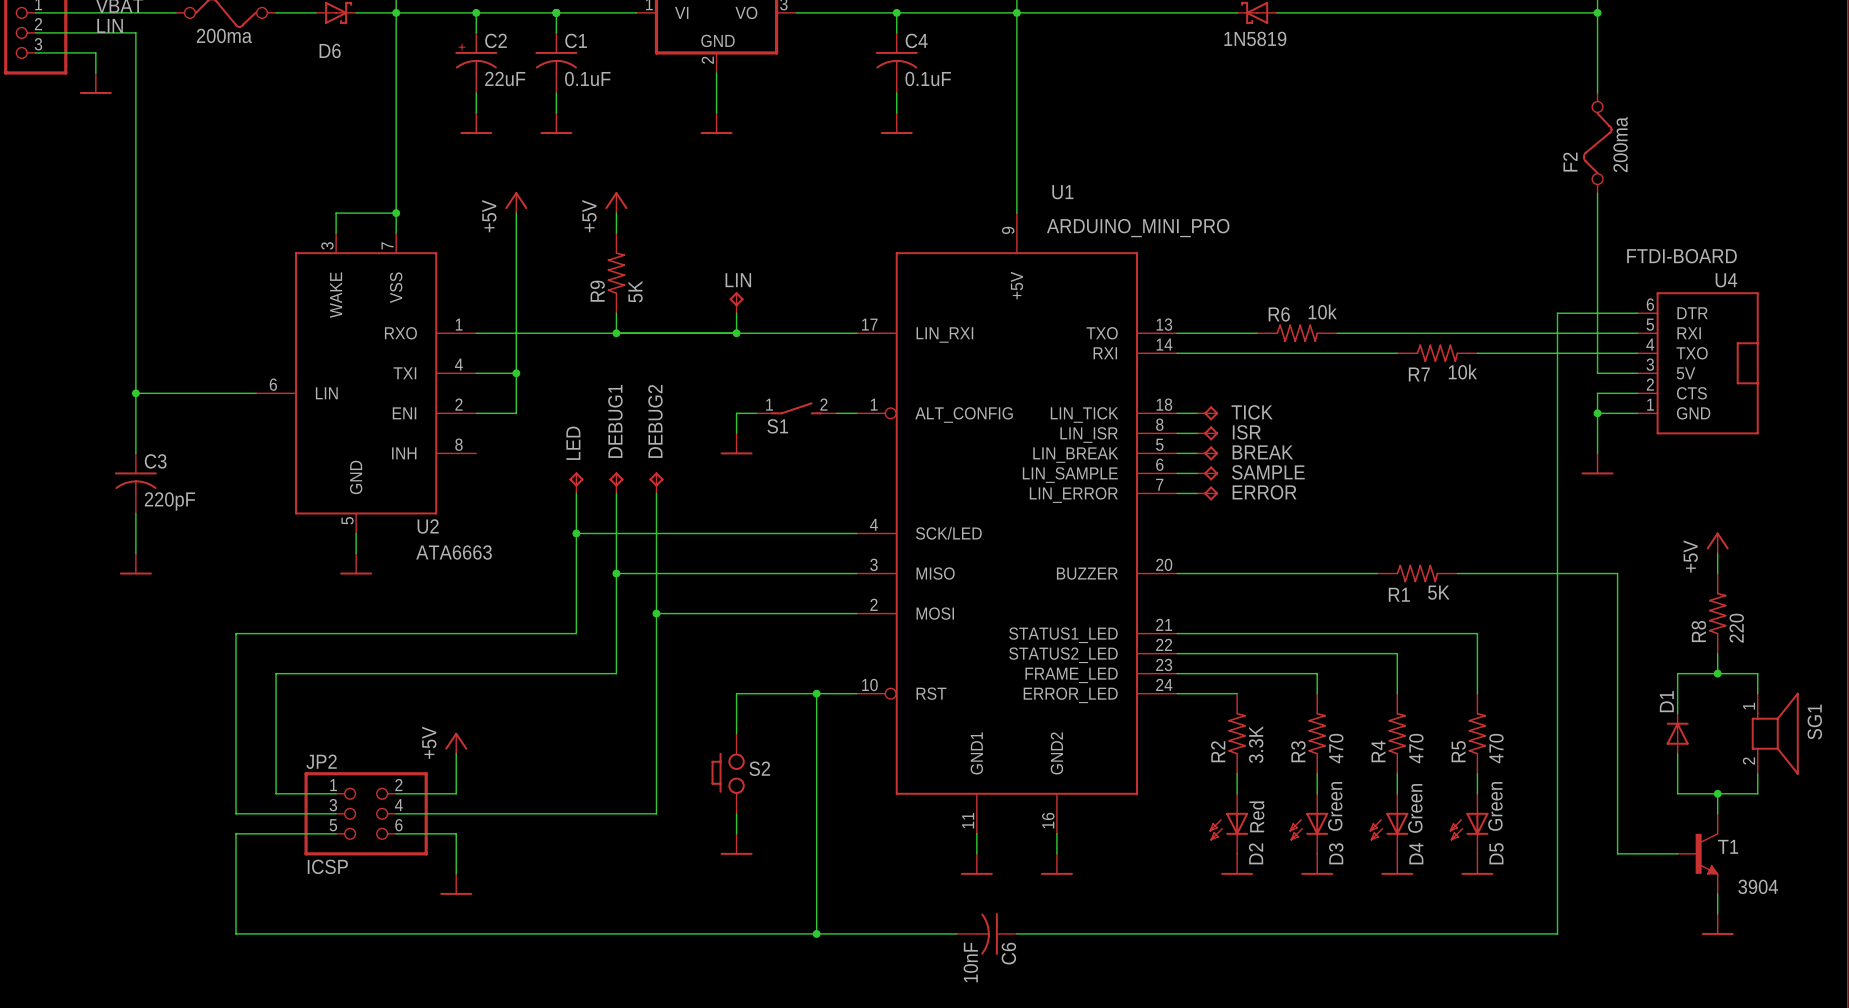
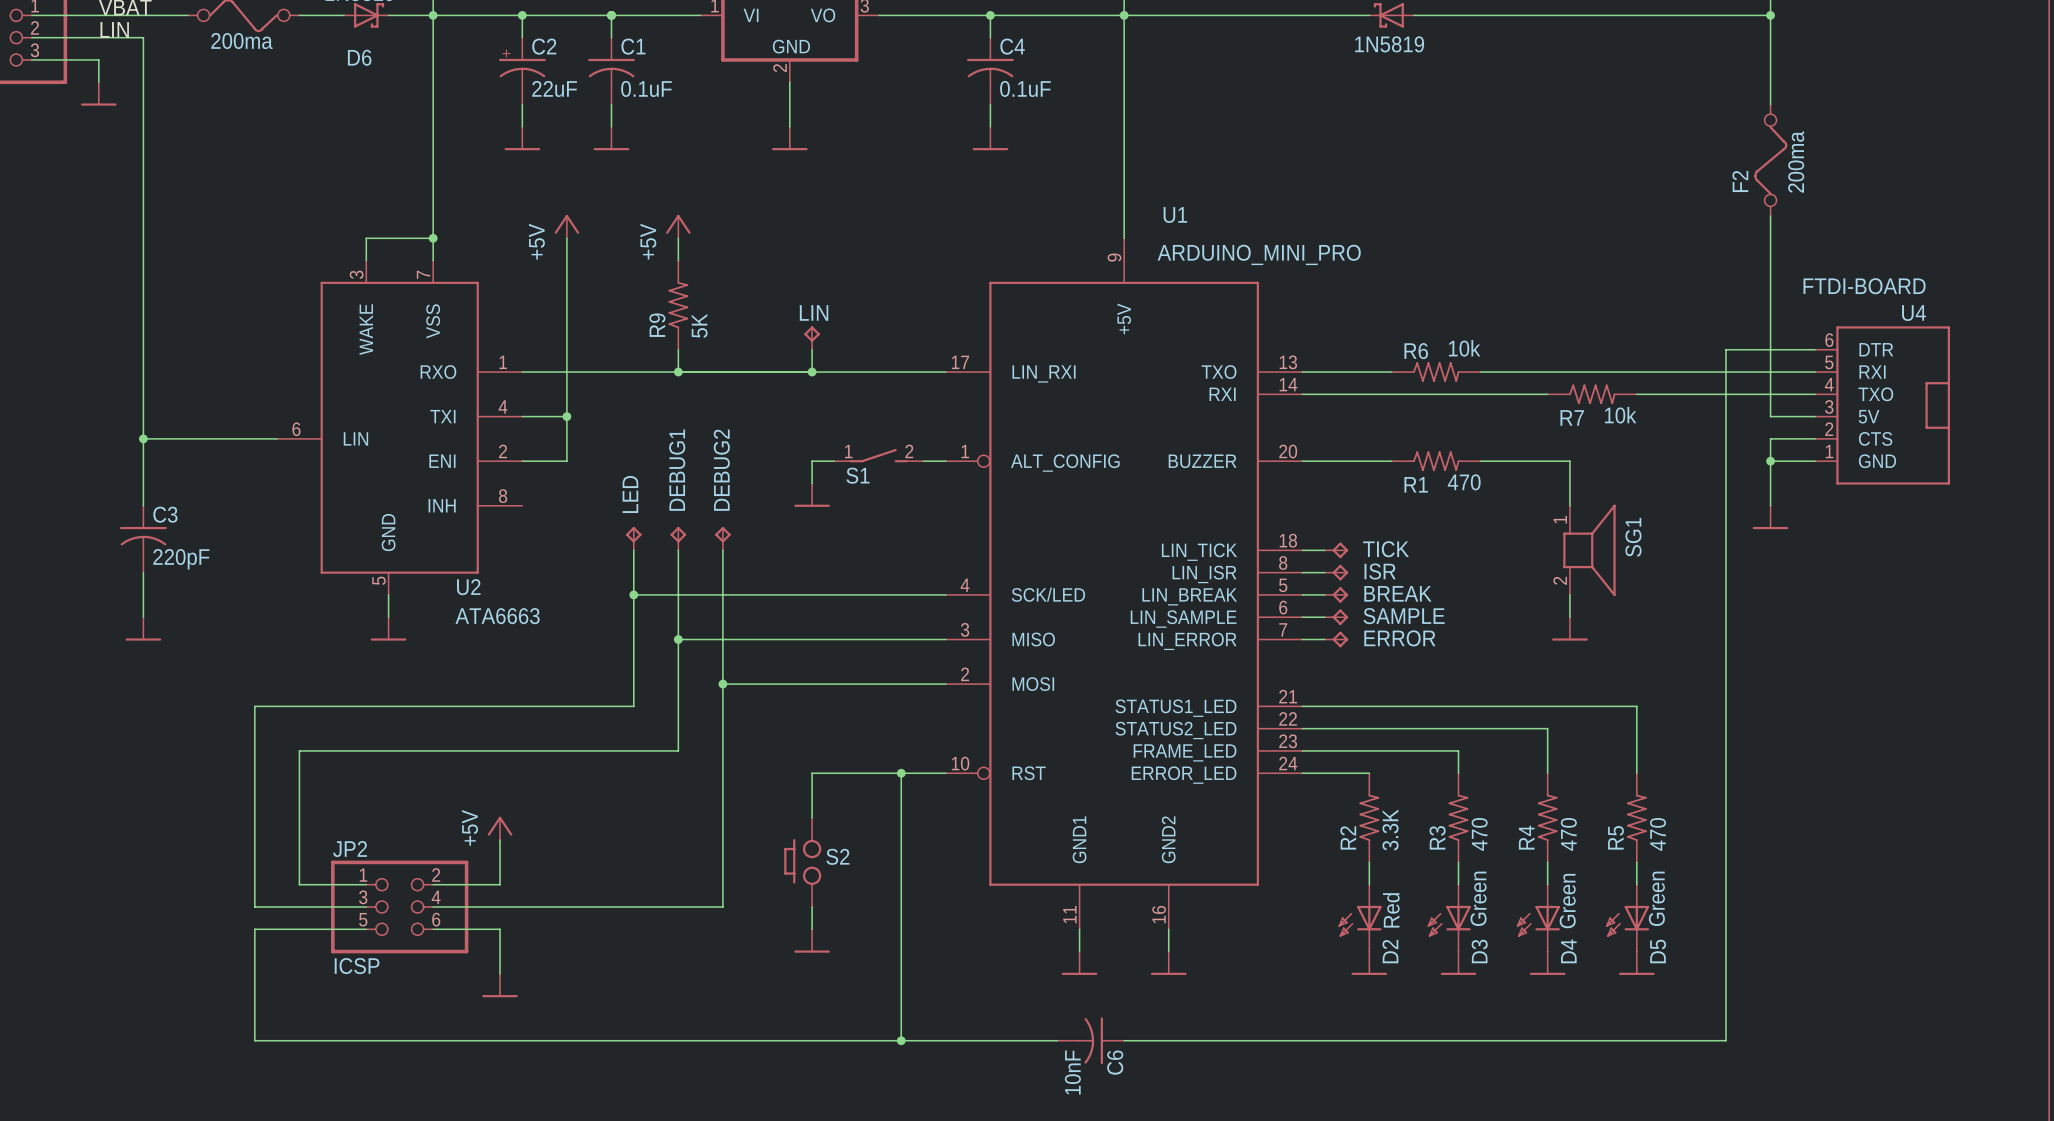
U1 symbol: [856, 213, 1178, 834] -> [945, 238, 1303, 930]
wire: none -> (1324, 461) (1391, 461)
TICK: (1207, 413) -> none
wire: none -> (1480, 461) (1569, 461) (1569, 505)
wire: (1177, 433) (1197, 433) -> (1302, 572) (1324, 572)
ISR position: (1207, 433) -> (1336, 572)
wire: (1177, 453) (1197, 453) -> (1302, 594) (1324, 594)
BREAK position: (1207, 453) -> (1336, 594)
wire: (1177, 473) (1197, 473) -> (1302, 617) (1324, 617)
SAMPLE position: (1207, 473) -> (1336, 617)
ERROR name: ERROR (1264, 492) -> TICK (1386, 549)
wire: none -> (1569, 594) (1569, 617)
power symbol: +5V (1717, 542) -> none
wire: (1717, 553) (1717, 573) -> none
power symbol: none -> (1569, 628)
wire: (1197, 573) (1377, 573) -> none
ERROR: none -> (1336, 639)
R1 position: (1417, 573) -> (1436, 461)
wire: (1457, 573) (1617, 573) (1617, 853) (1677, 853) -> none
R1 value: 5K (1438, 592) -> 470 (1464, 482)
R8: 220 (1717, 613) -> none
wire: (1717, 653) (1717, 673) -> none
junction: (1717, 673) -> none
wire: (1757, 693) (1757, 673) (1677, 673) (1677, 713) -> none
D1: (1677, 733) -> none
SG1 position: (1775, 733) -> (1589, 550)
wire: (1677, 753) (1677, 793) (1757, 793) (1757, 773) -> none
wire: (1717, 793) (1717, 813) -> none
junction: (1717, 793) -> none
T1: 3904 (1697, 853) -> none
wire: (1717, 893) (1717, 913) -> none
power symbol: (1717, 924) -> none

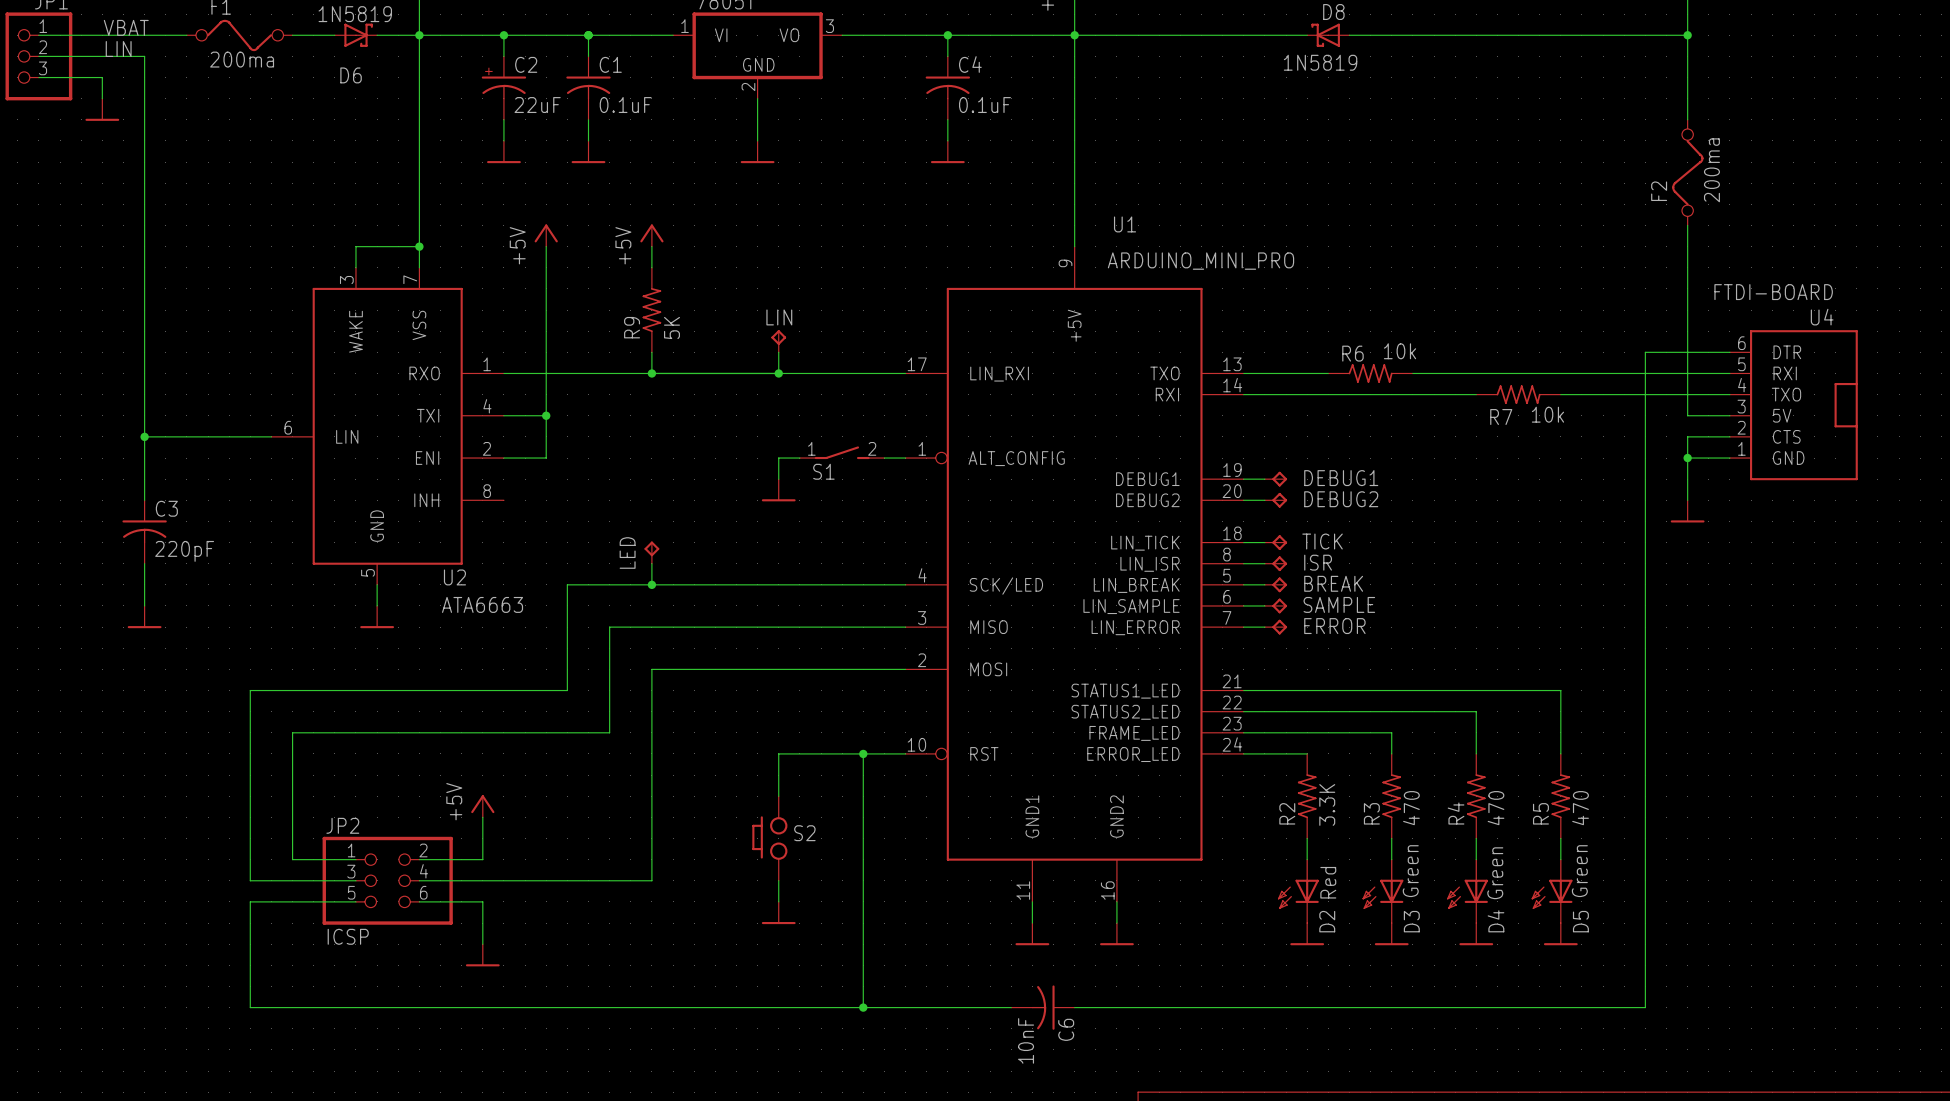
U1 symbol: [945, 238, 1303, 930] -> [905, 246, 1244, 902]
wire: (1302, 461) (1391, 461) -> none
R1: 470 (1436, 461) -> none
wire: (1480, 461) (1569, 461) (1569, 505) -> none
wire: none -> (1243, 479) (1264, 479)
LED name position: LED (630, 494) -> LED (627, 552)
wire: none -> (1243, 500) (1264, 500)
DEBUG1 rotation: 0° (678, 534) -> 90° clockwise (1279, 479)
DEBUG2 rotation: 0° (722, 534) -> 90° clockwise (1279, 500)
LED position: (633, 538) -> (651, 552)
DEBUG1 position: (678, 538) -> (1275, 479)
DEBUG2 position: (722, 538) -> (1275, 500)
wire: (633, 550) (633, 639) -> (651, 627) (609, 627)
wire: (722, 550) (722, 906) (678, 906) -> none
SG1: (1589, 550) -> none
wire: none -> (609, 584) (567, 584) (567, 690)
junction: (633, 594) -> none
wire: (678, 594) (678, 684) -> (694, 669) (651, 669)
junction: none -> (651, 584)
wire: (1569, 594) (1569, 617) -> none
power symbol: (1569, 628) -> none
junction: (678, 639) -> none
junction: (722, 684) -> none
wire: (589, 706) (633, 706) -> (609, 732) (609, 690)
wire: (633, 750) (678, 750) -> (651, 880) (651, 732)

